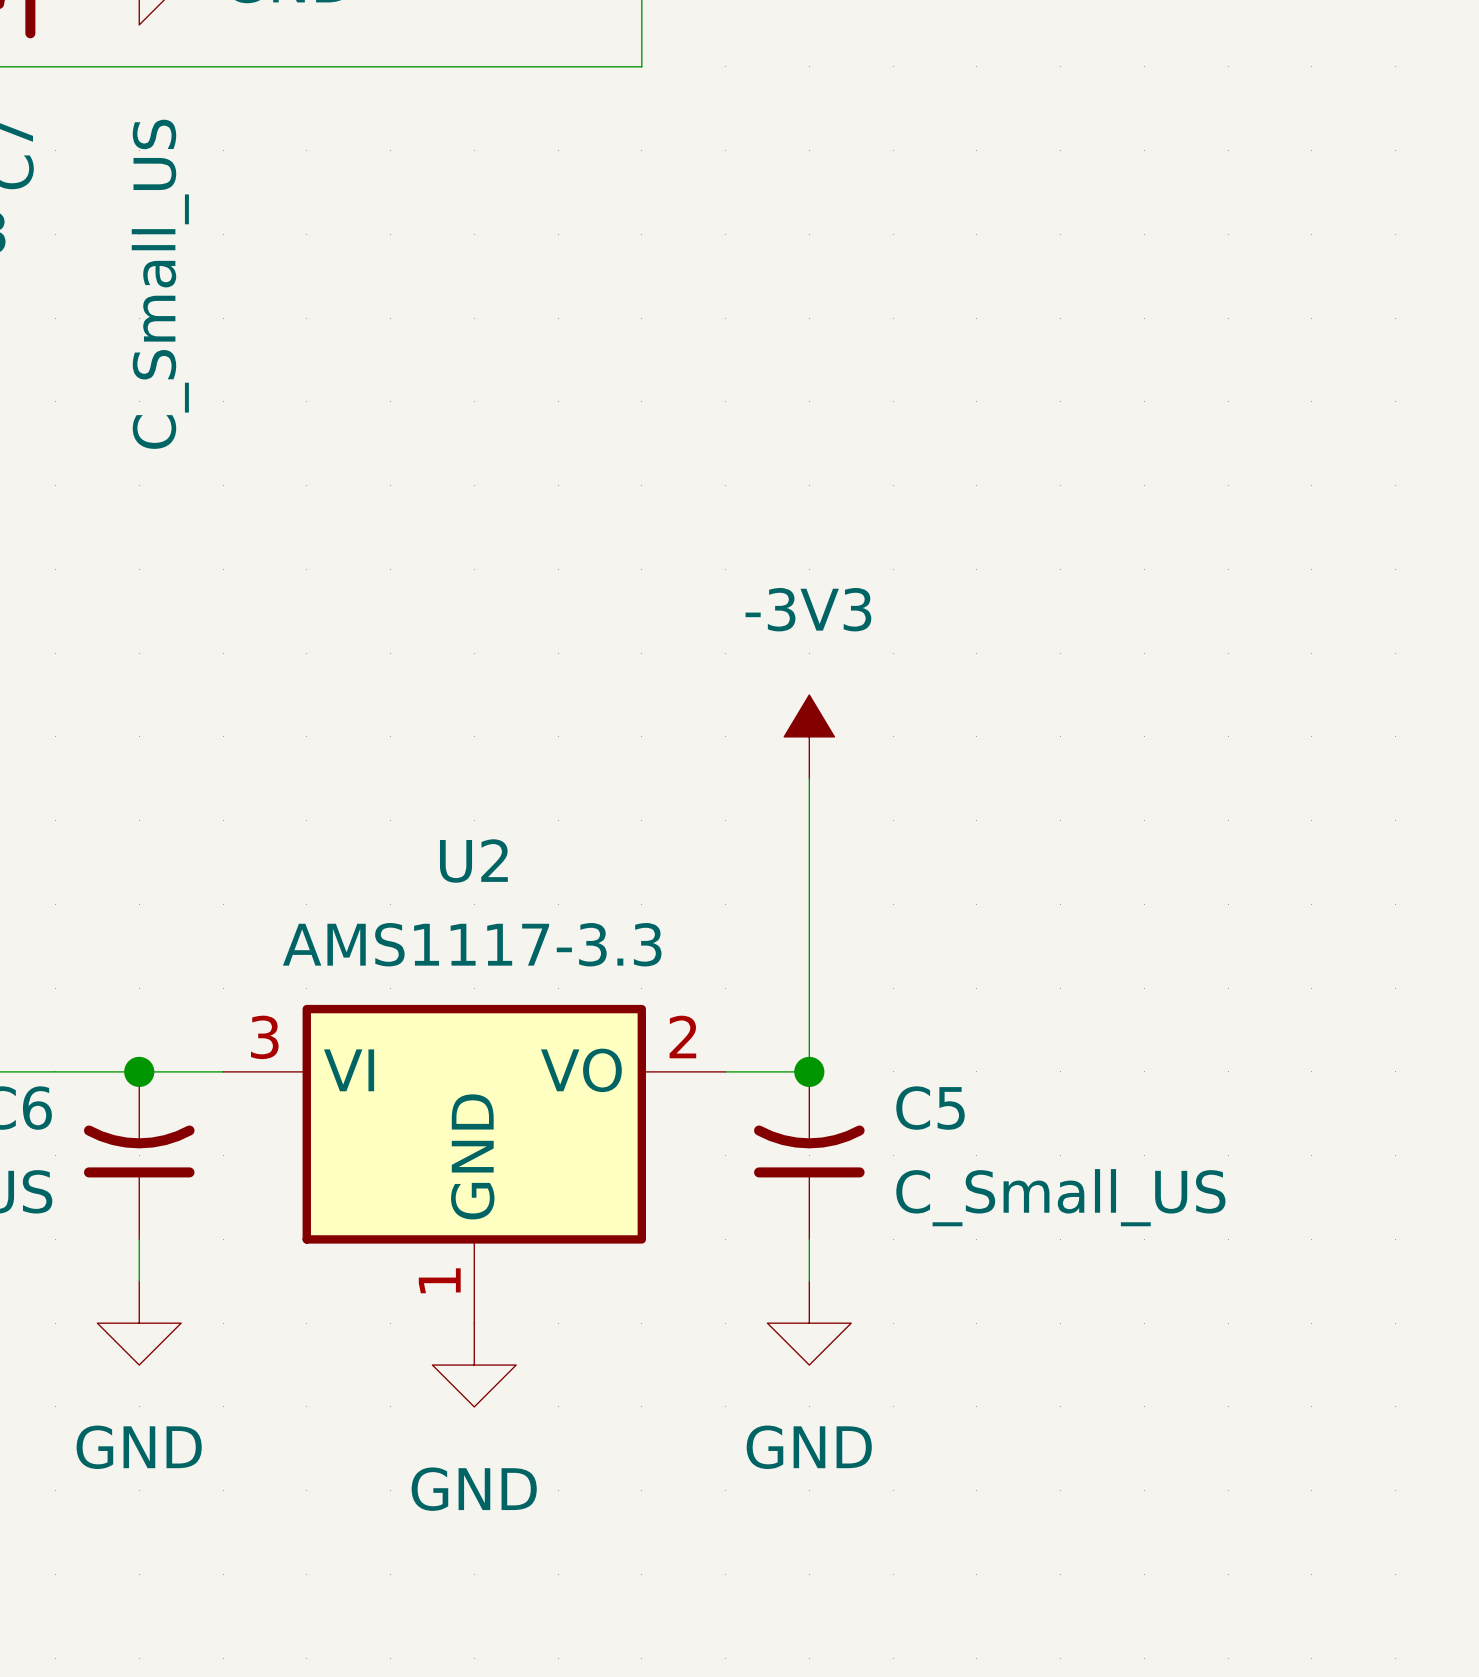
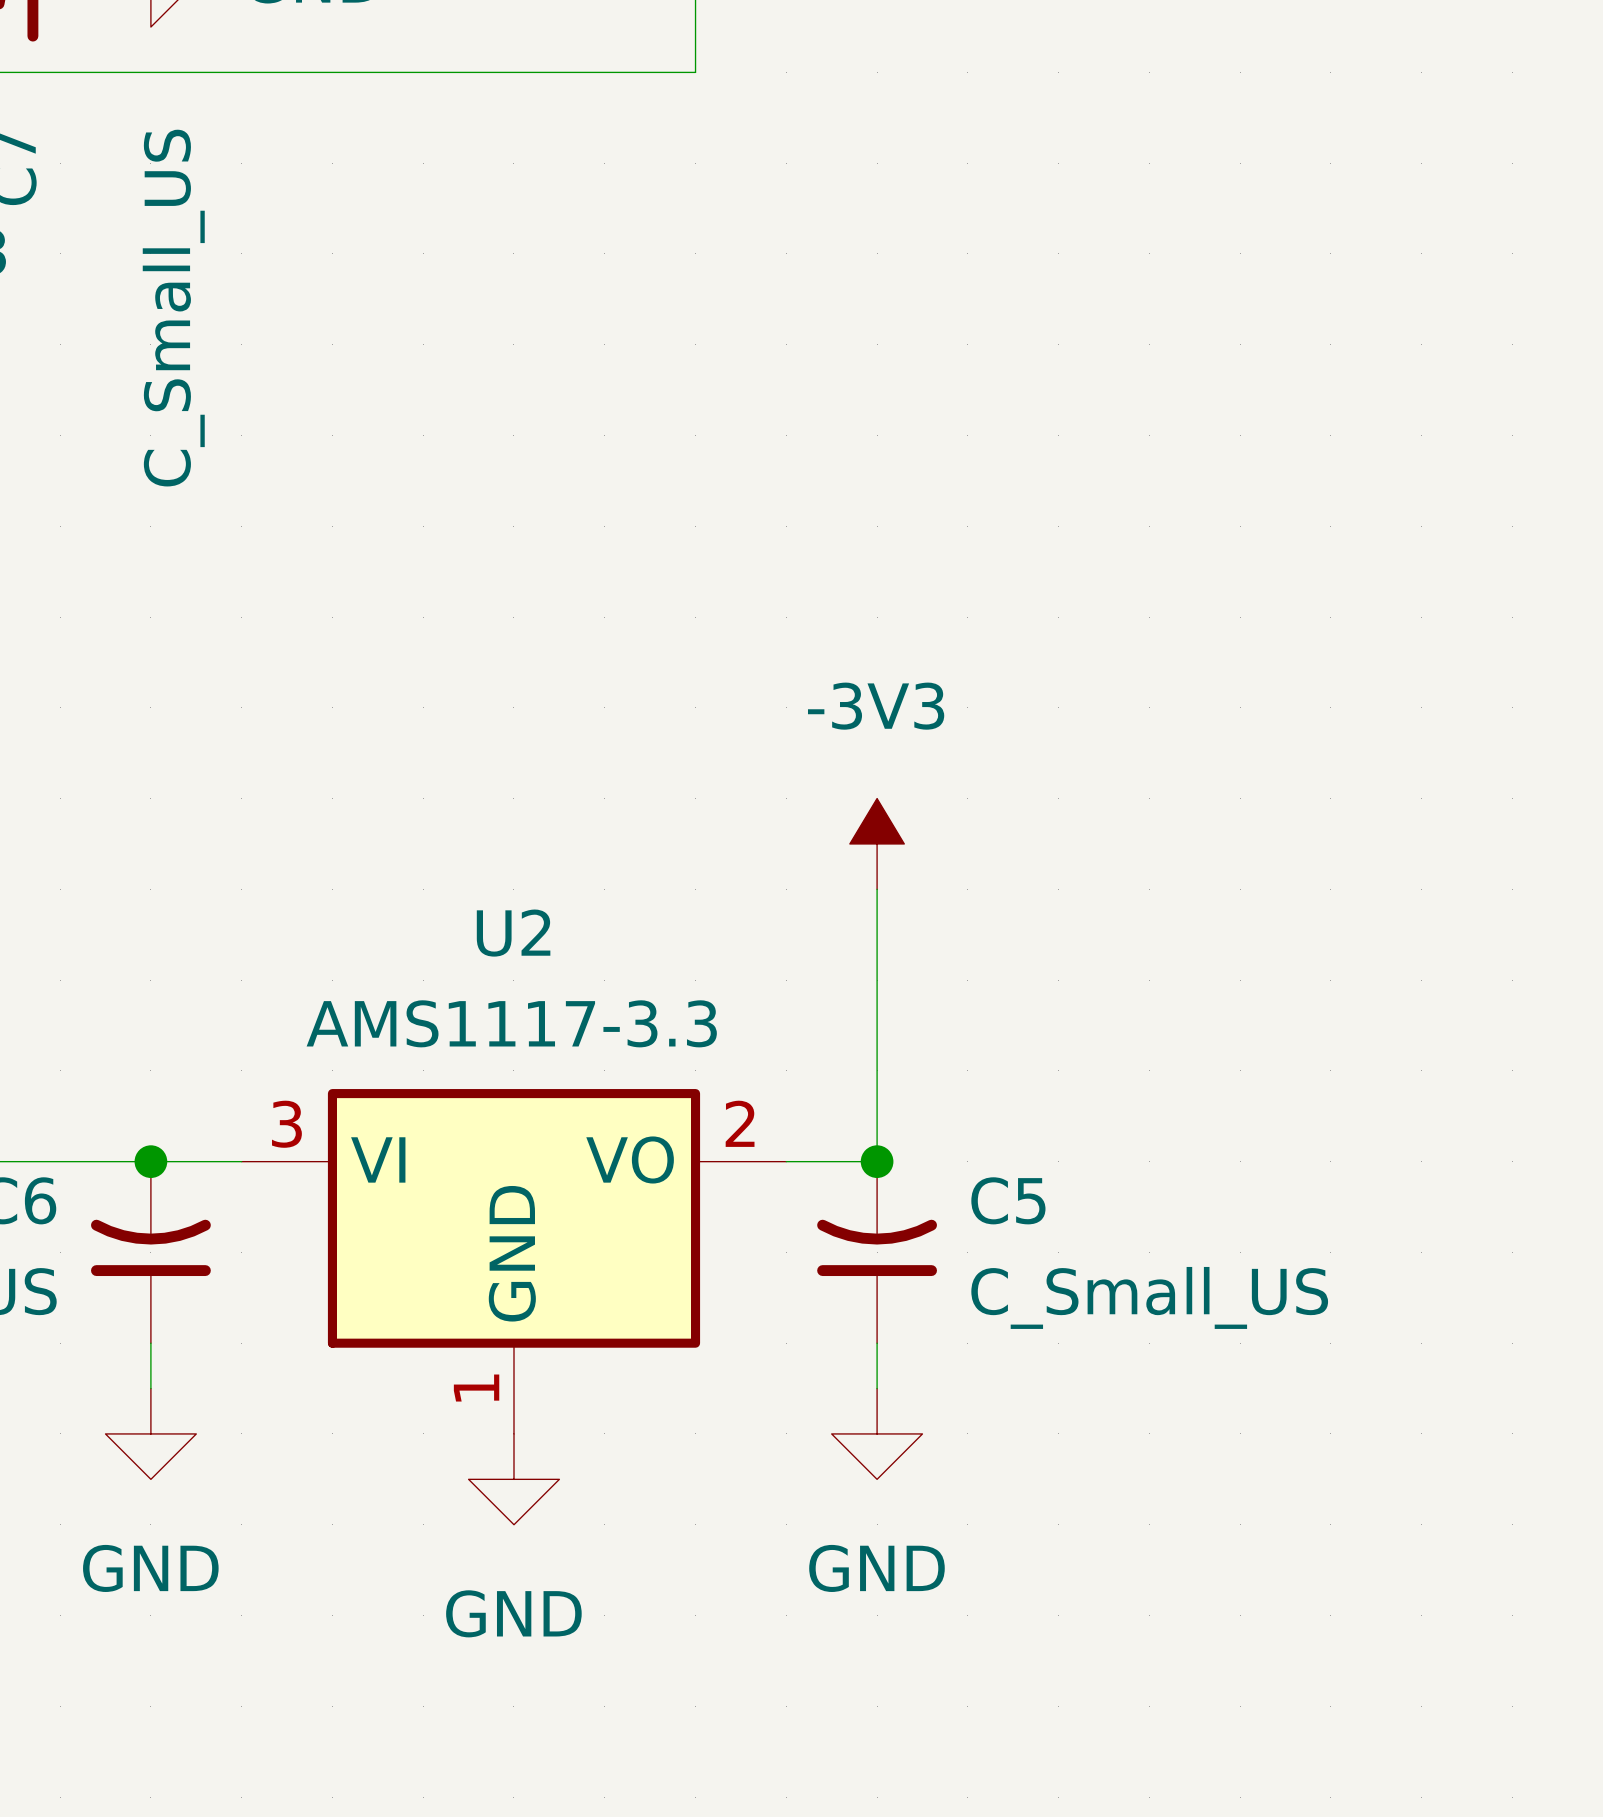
power symbol position: -3V3 (809, 736) -> -3V3 (877, 843)

